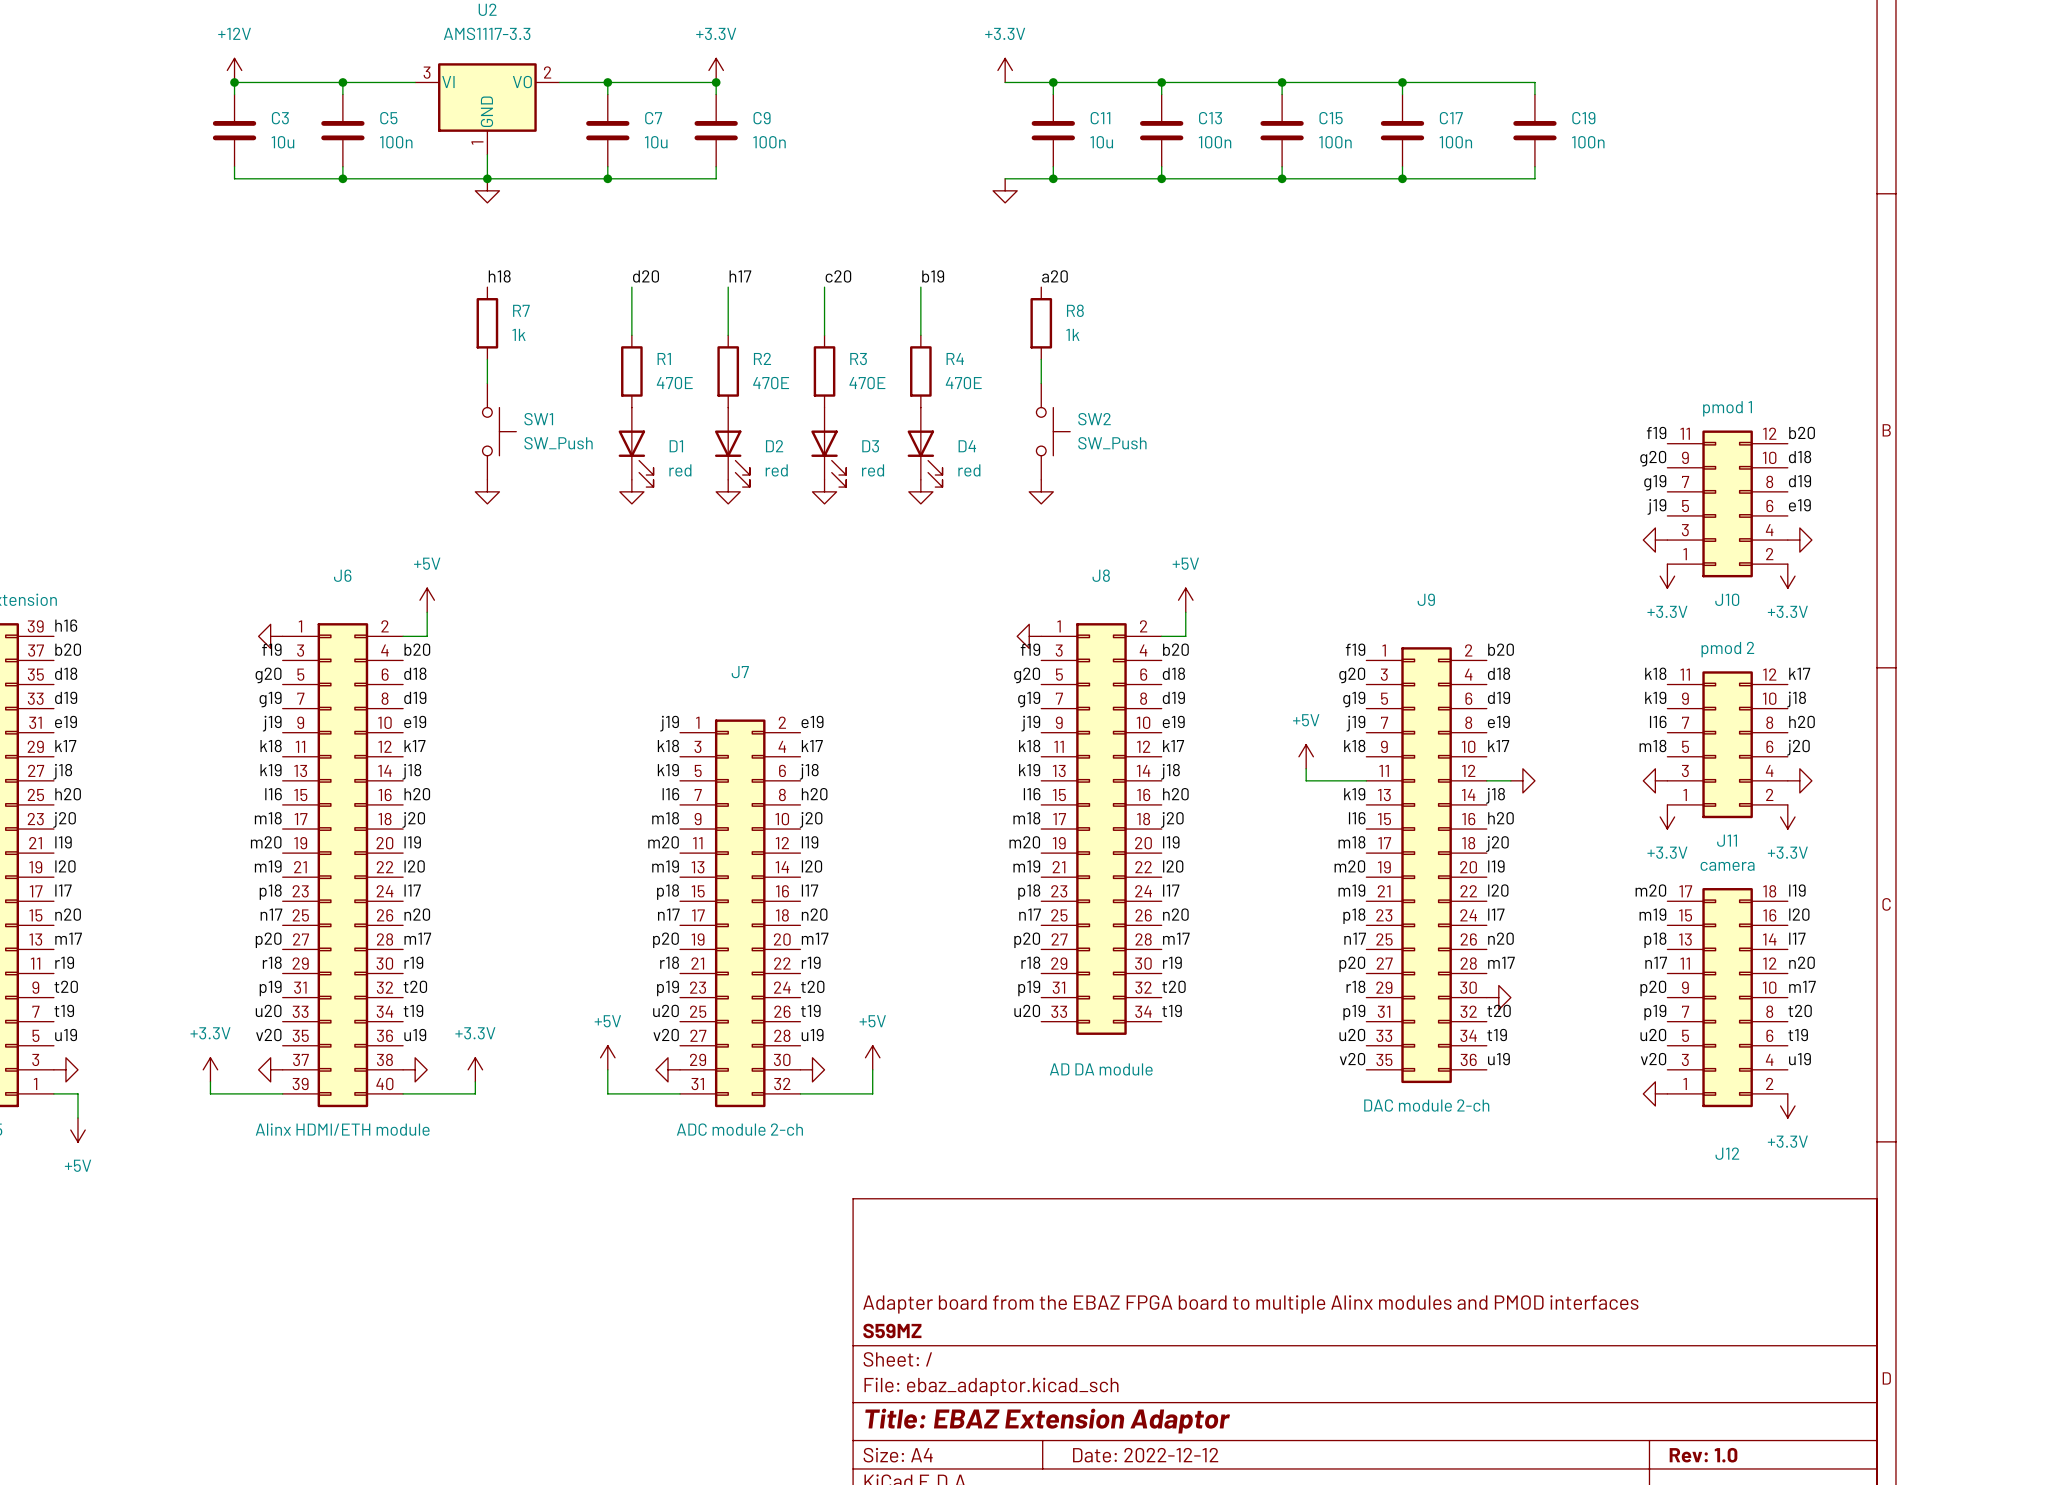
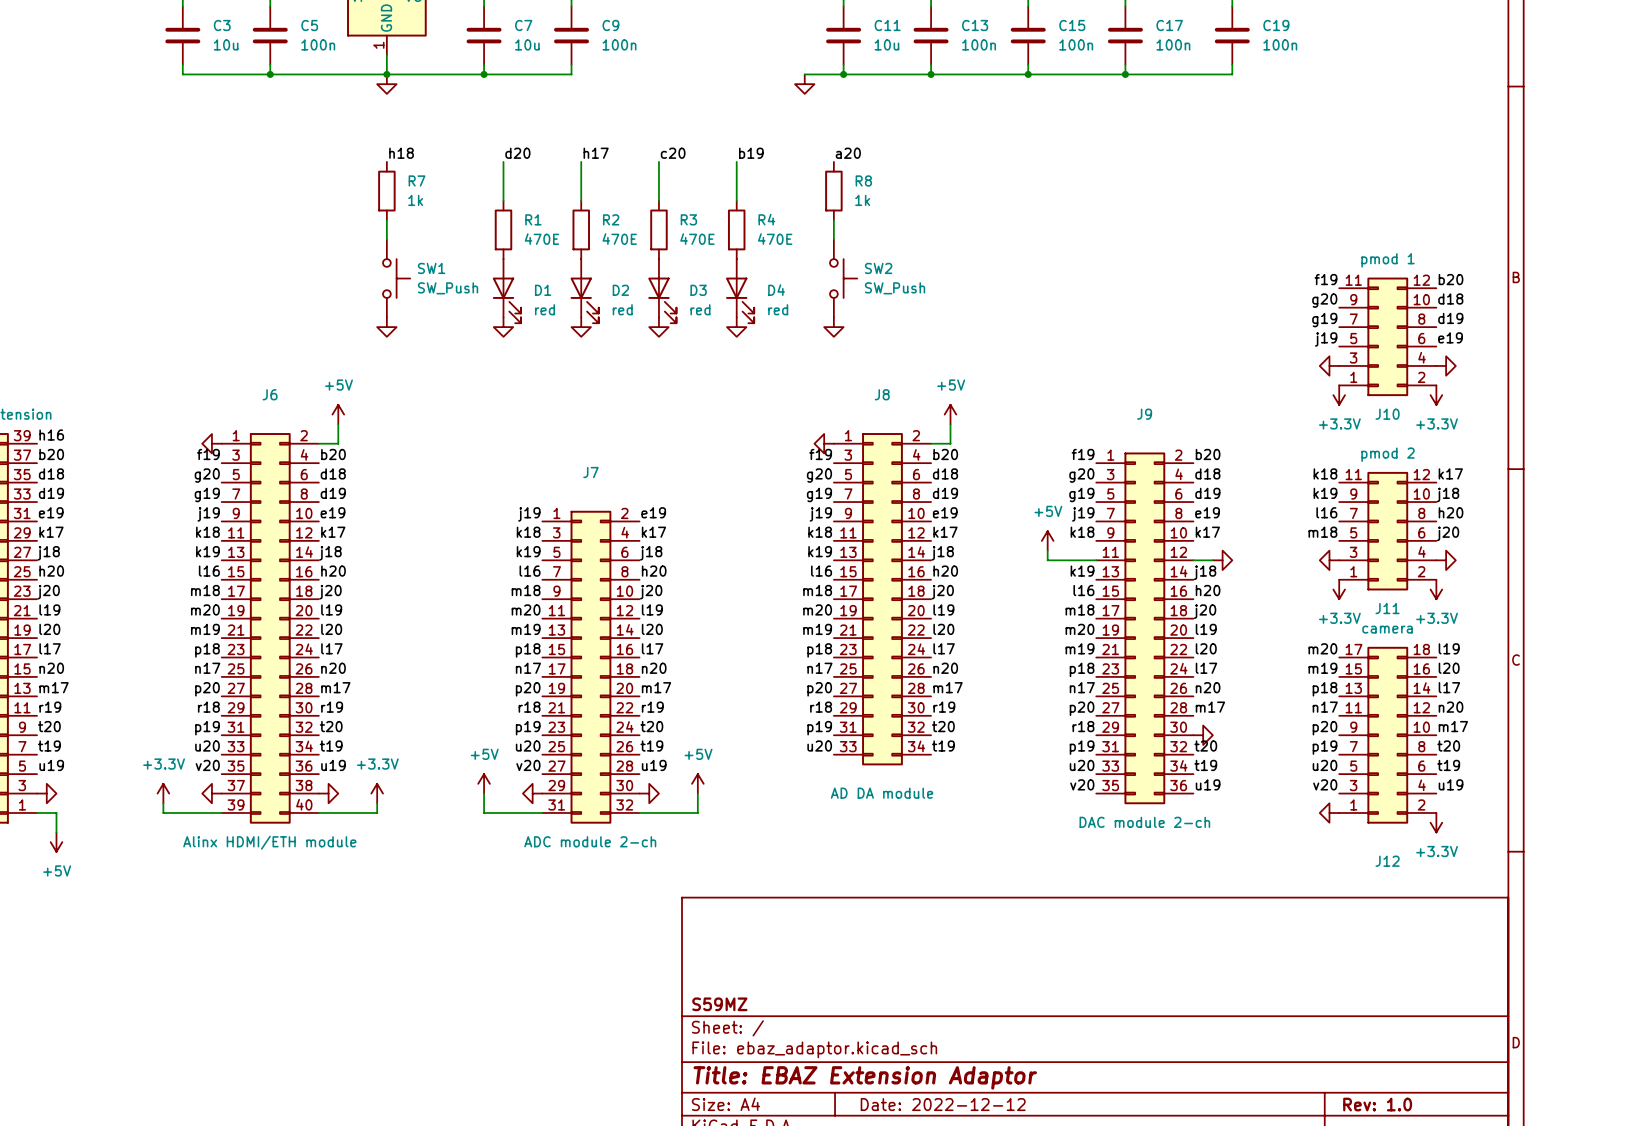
title block: Adapter board from the EBAZ FPGA board to multiple Alinx modules and PMOD interfaces (1250, 1304) -> none

